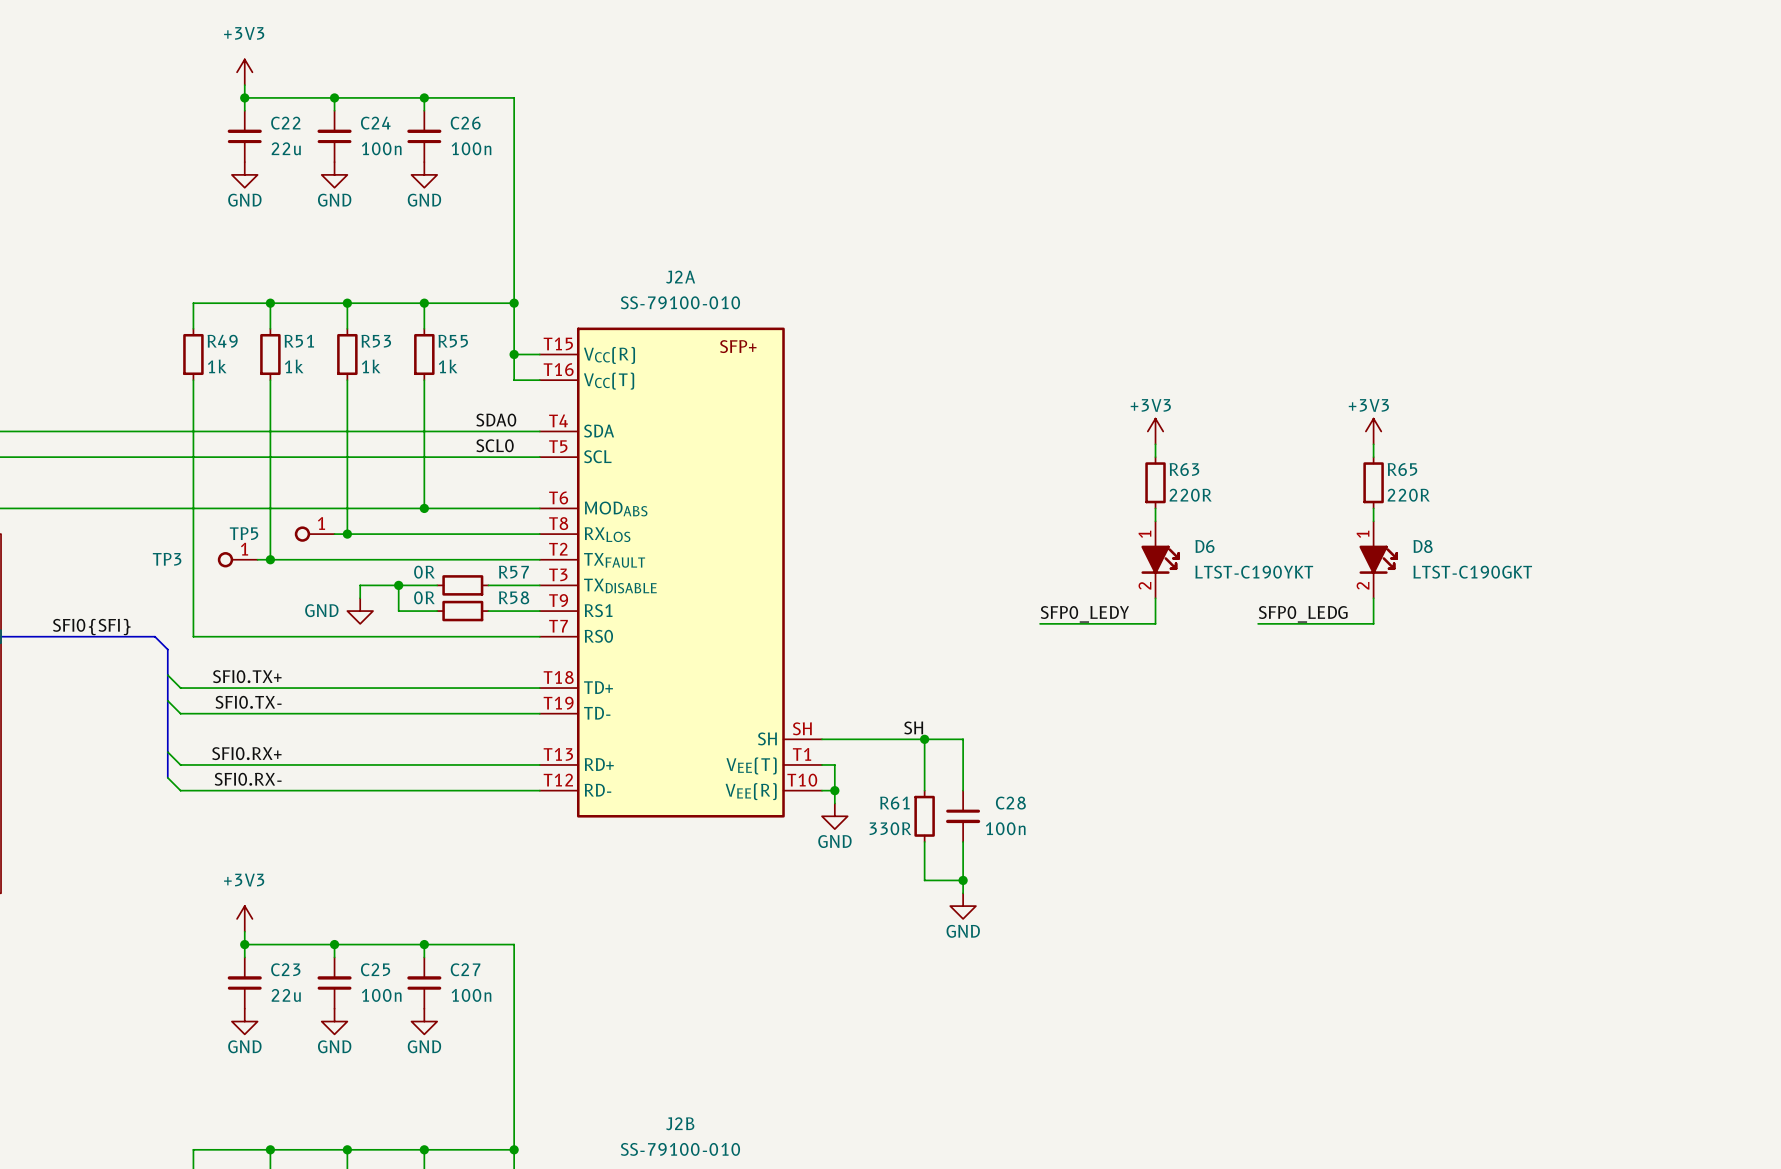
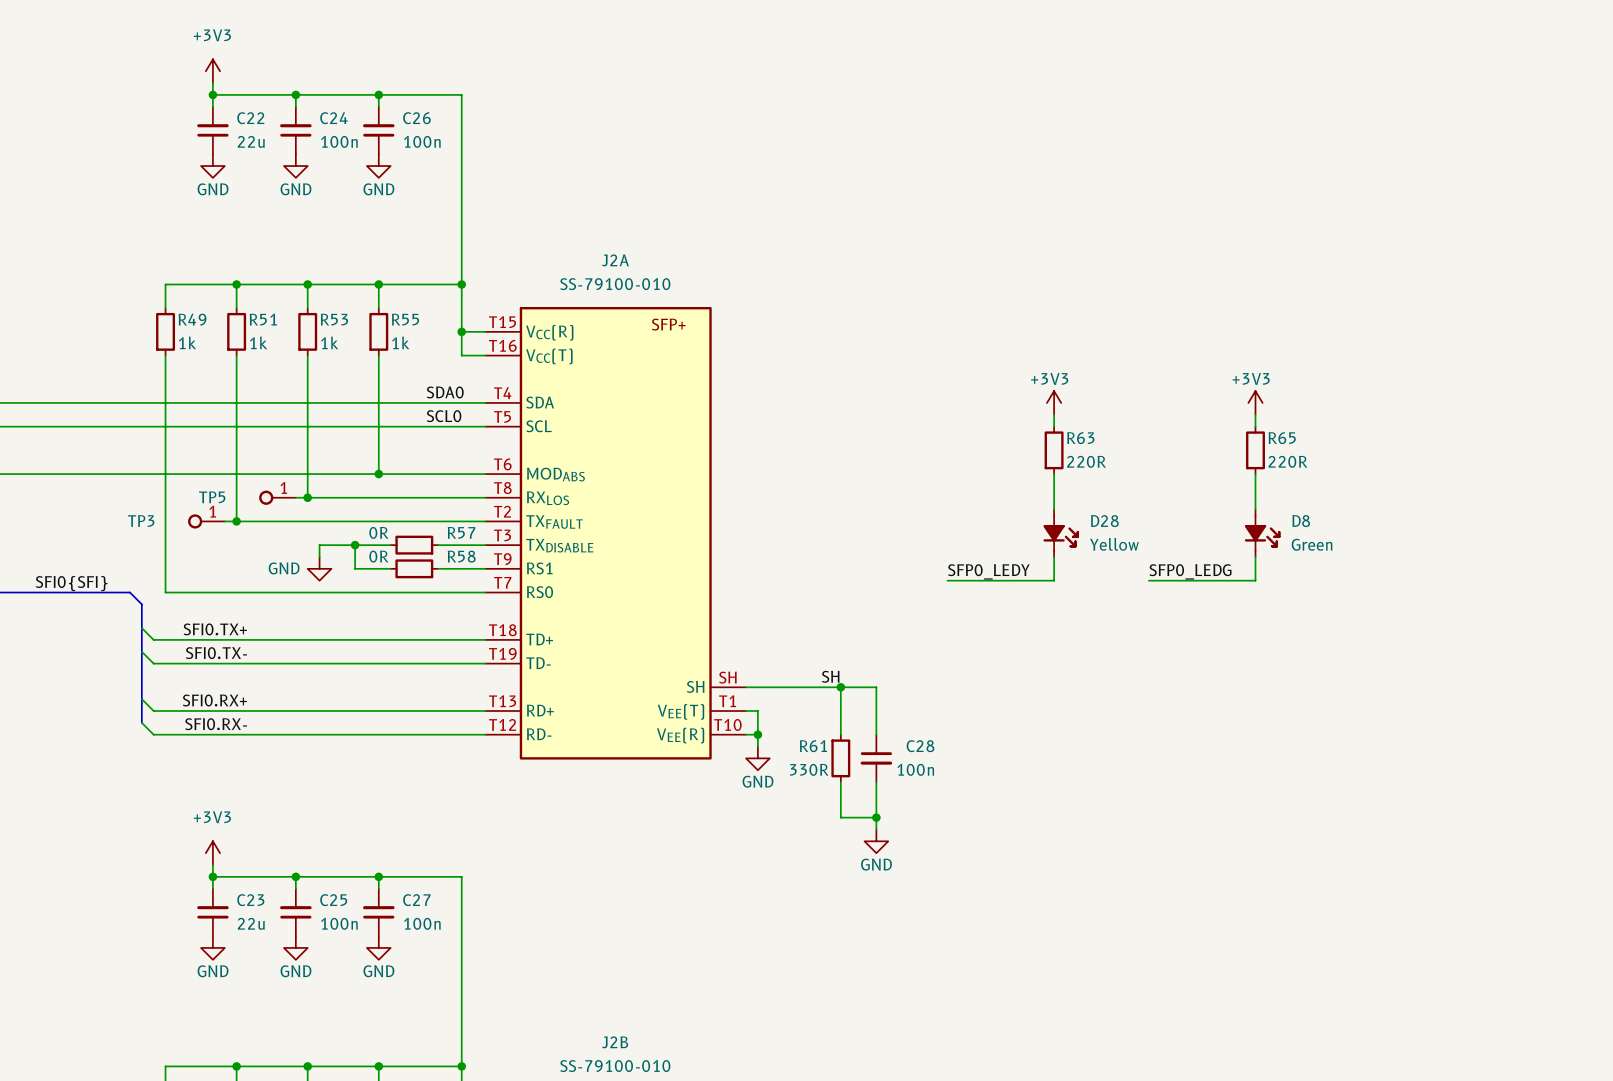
D8 symbol: [1359, 521, 1398, 599] -> [1244, 509, 1281, 557]
D6: (1160, 559) -> none
D28: none -> (1061, 533)
D8 text: LTST-C190GKT (1472, 572) -> none
D8 text: none -> Green (1312, 544)

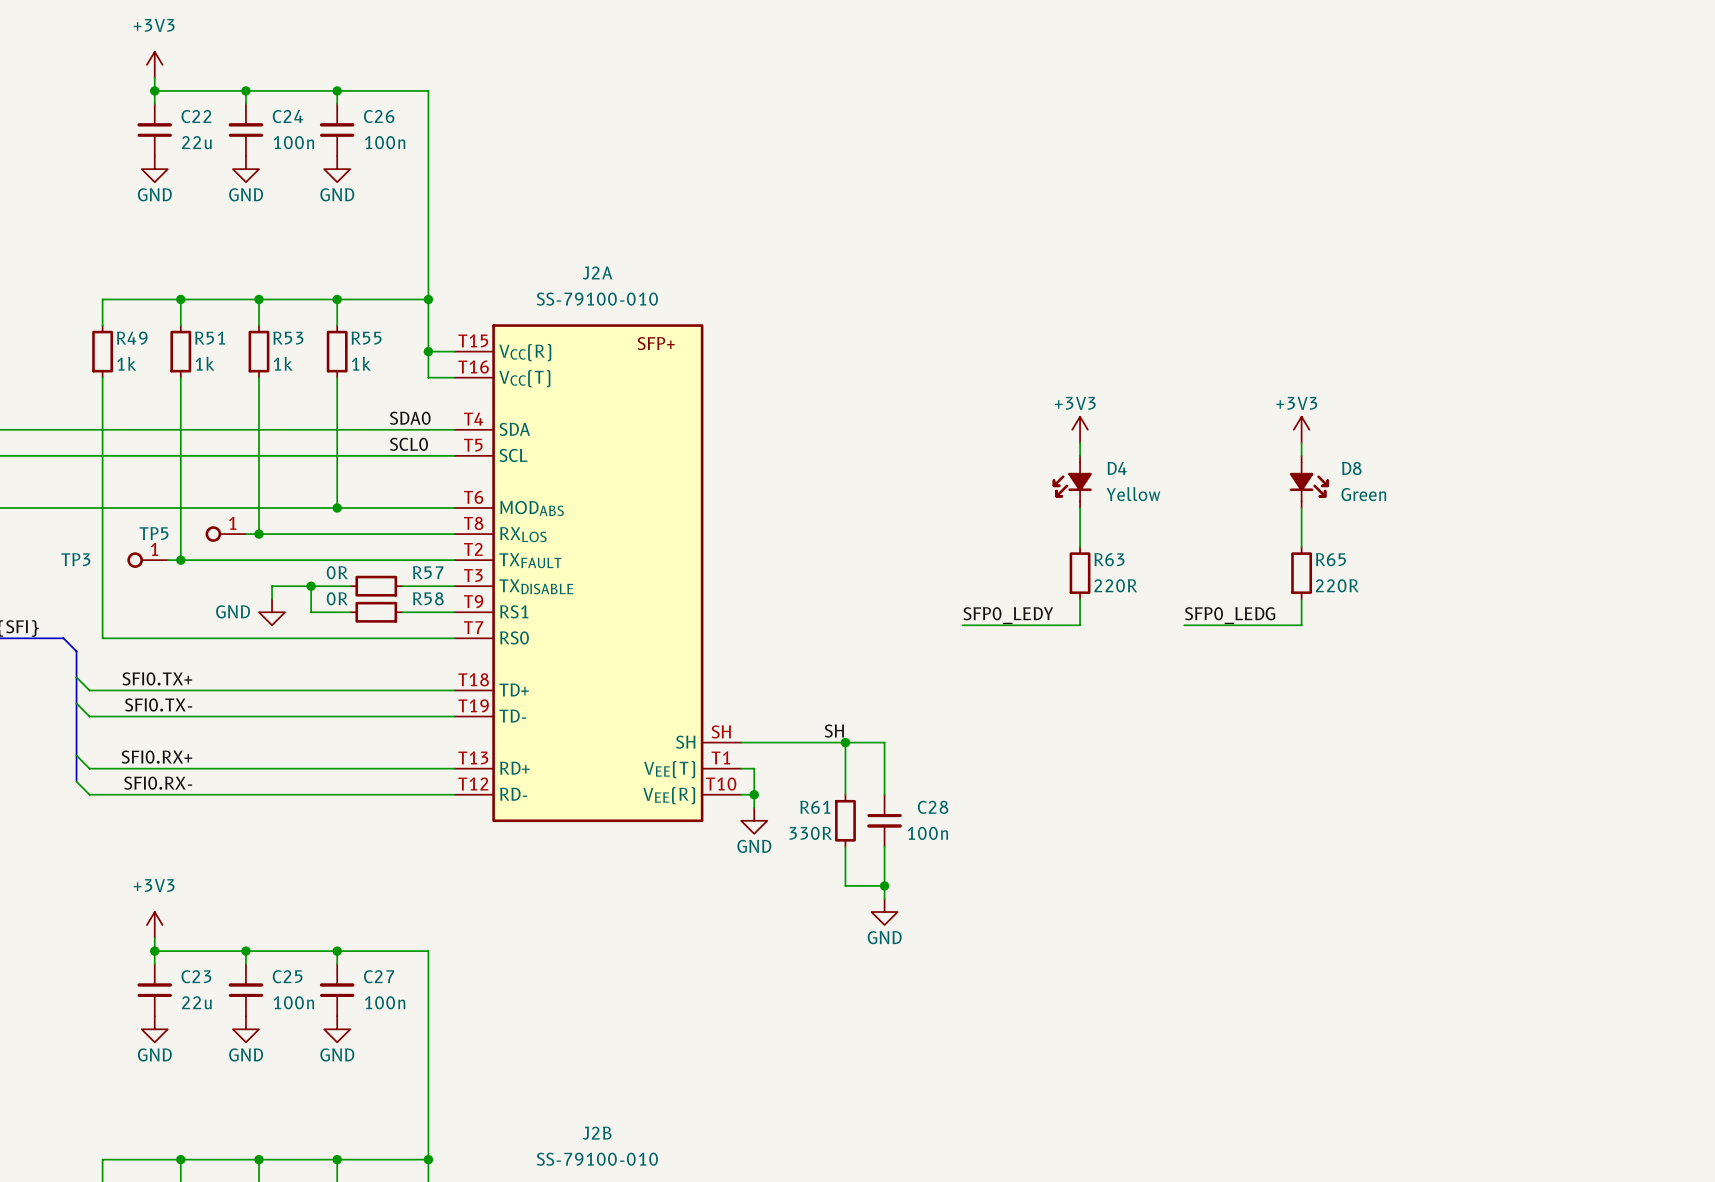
D4: none -> (1072, 481)
R63 position: (1054, 450) -> (1080, 573)
R65 position: (1255, 450) -> (1301, 573)
D28: (1061, 533) -> none
D8 position: (1262, 533) -> (1309, 481)

